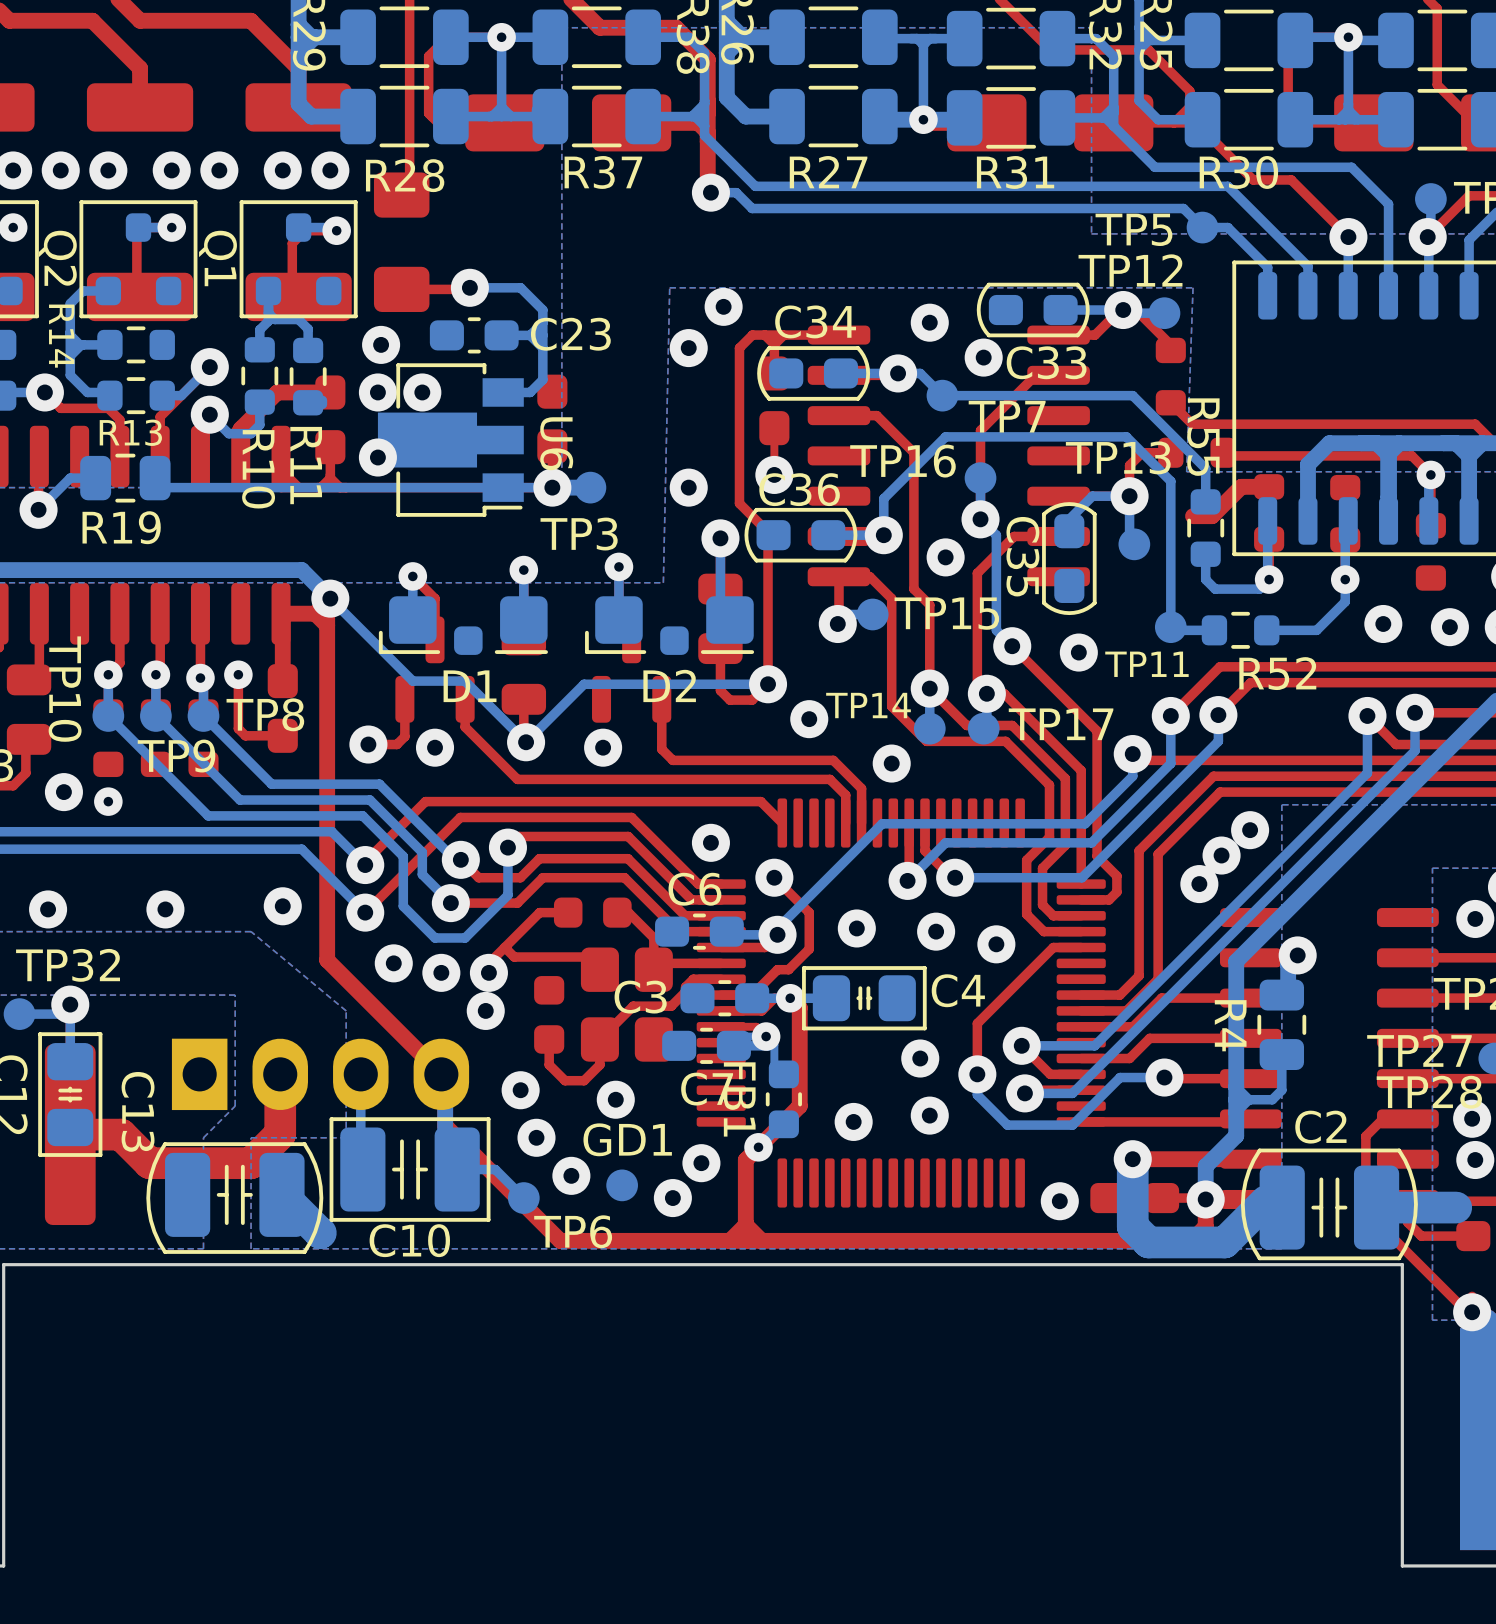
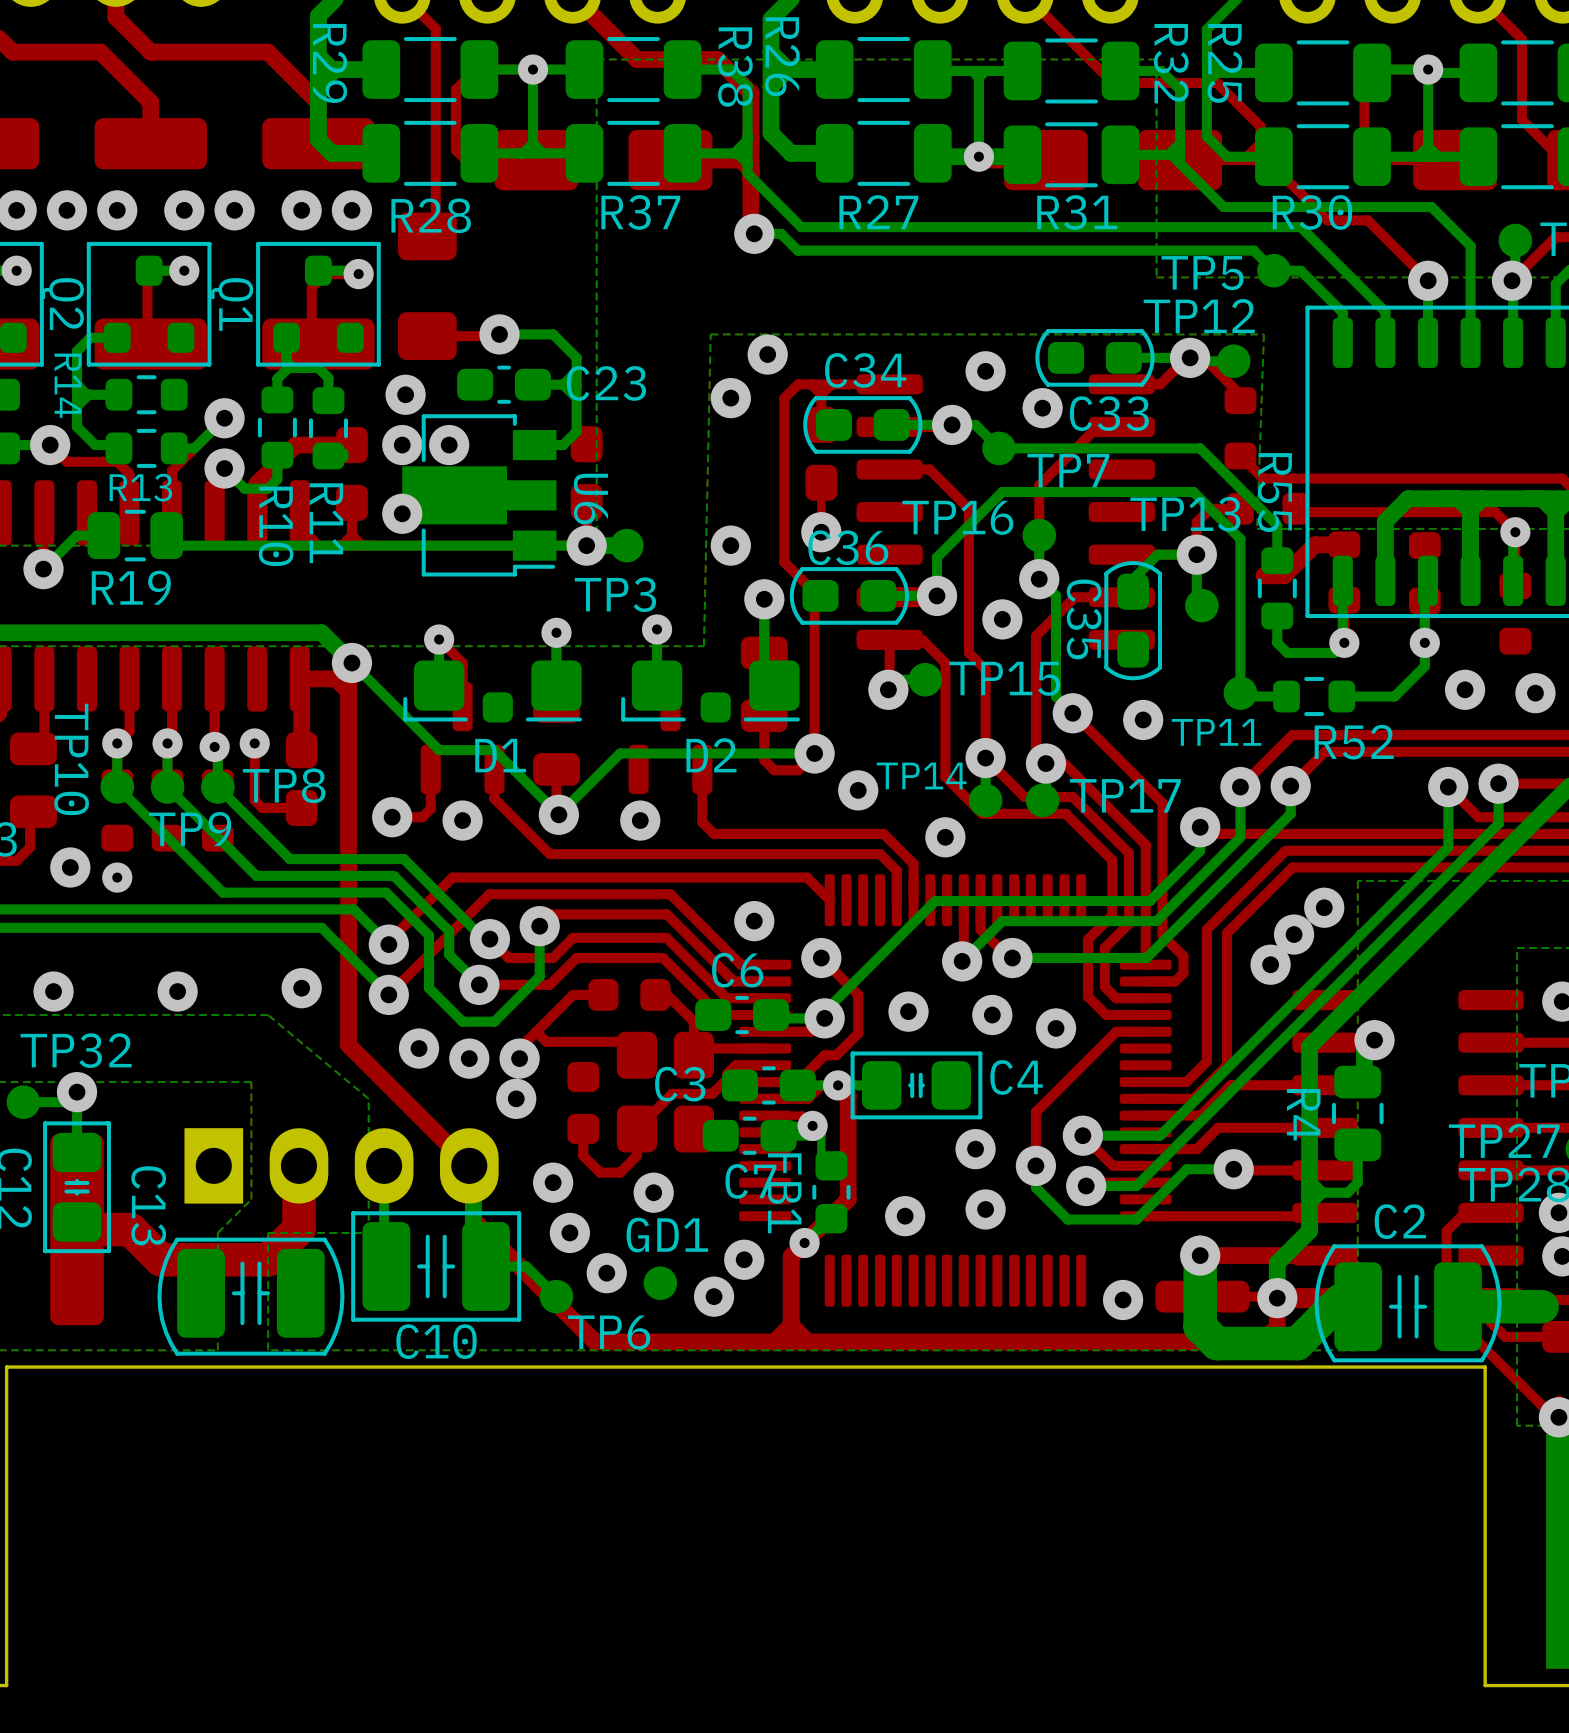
bottom track: (281, 1194) (320, 1232) -> none

